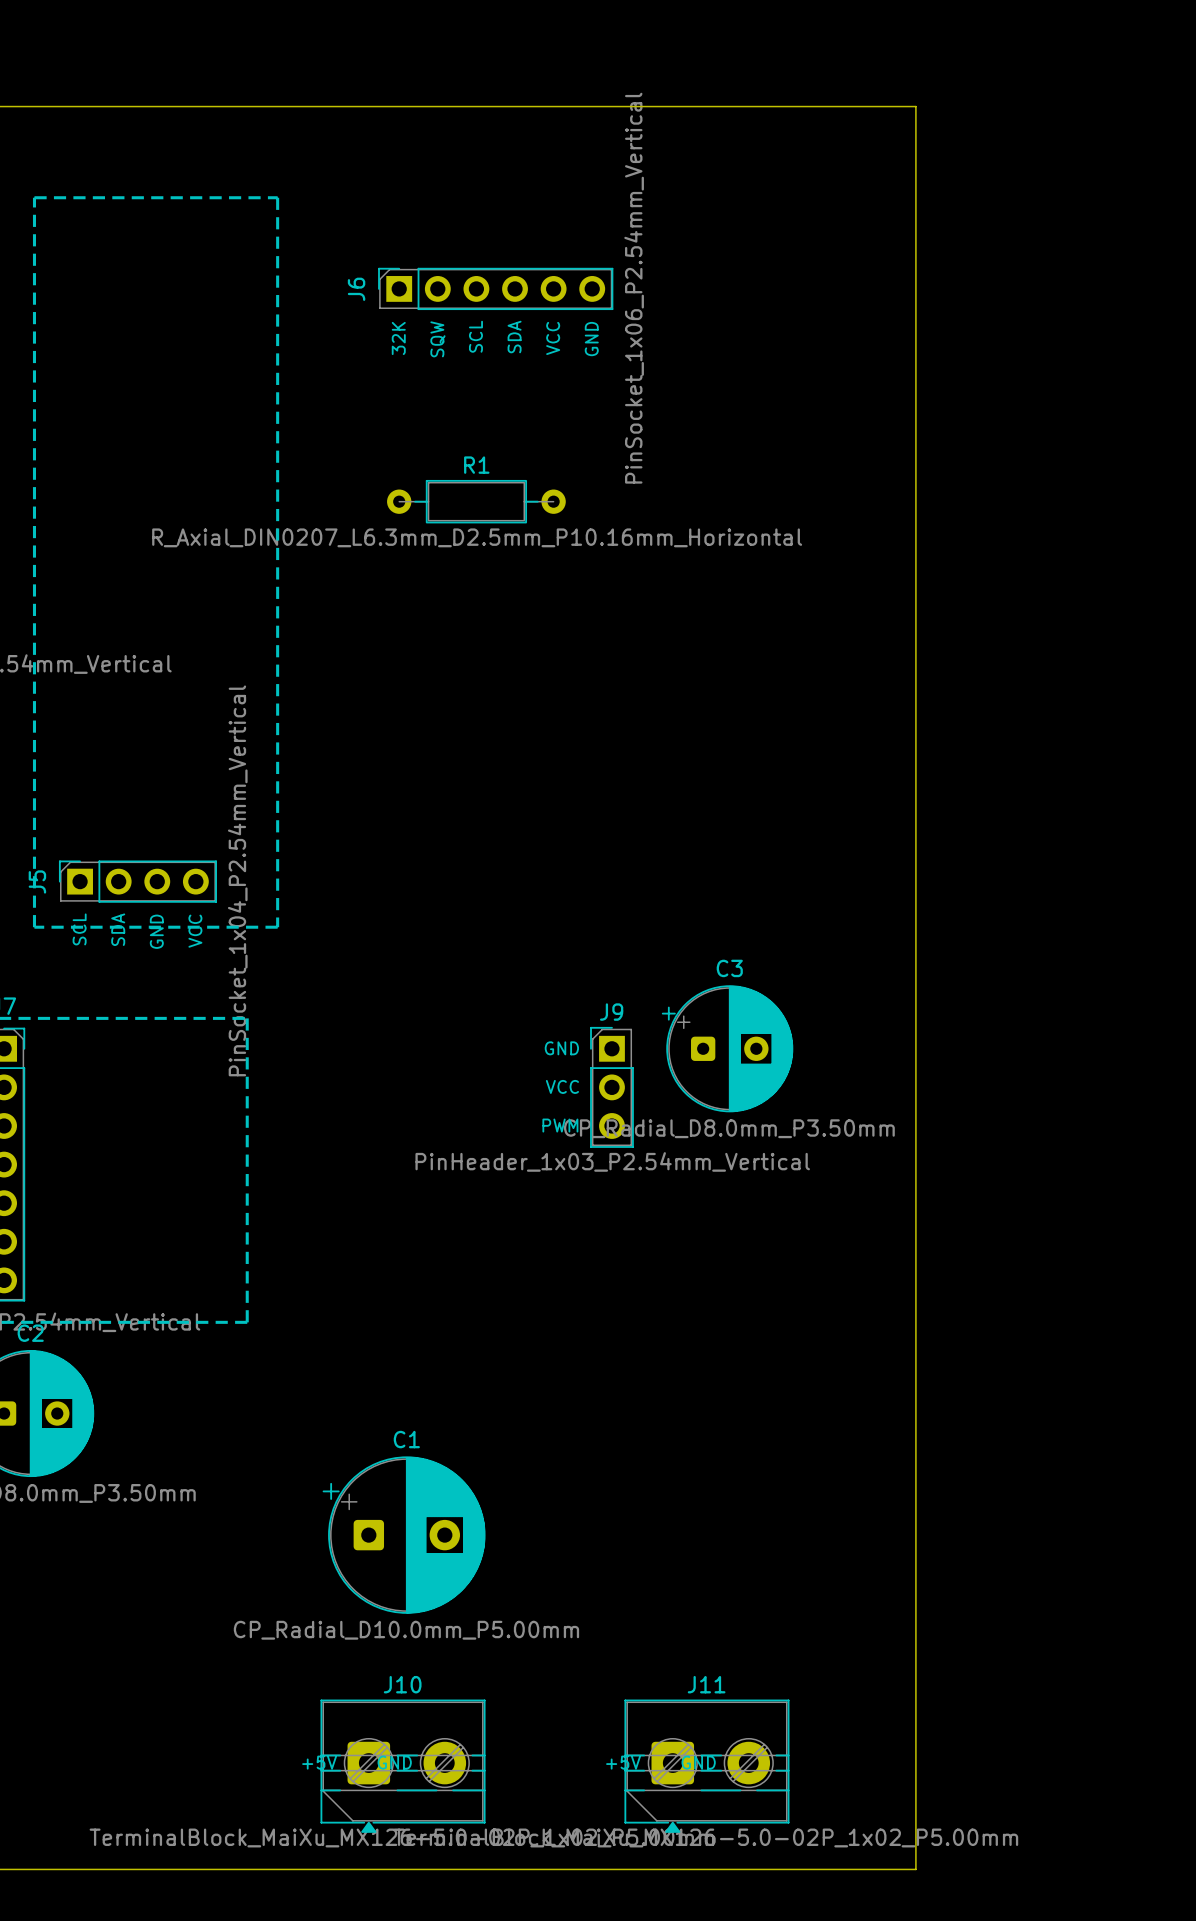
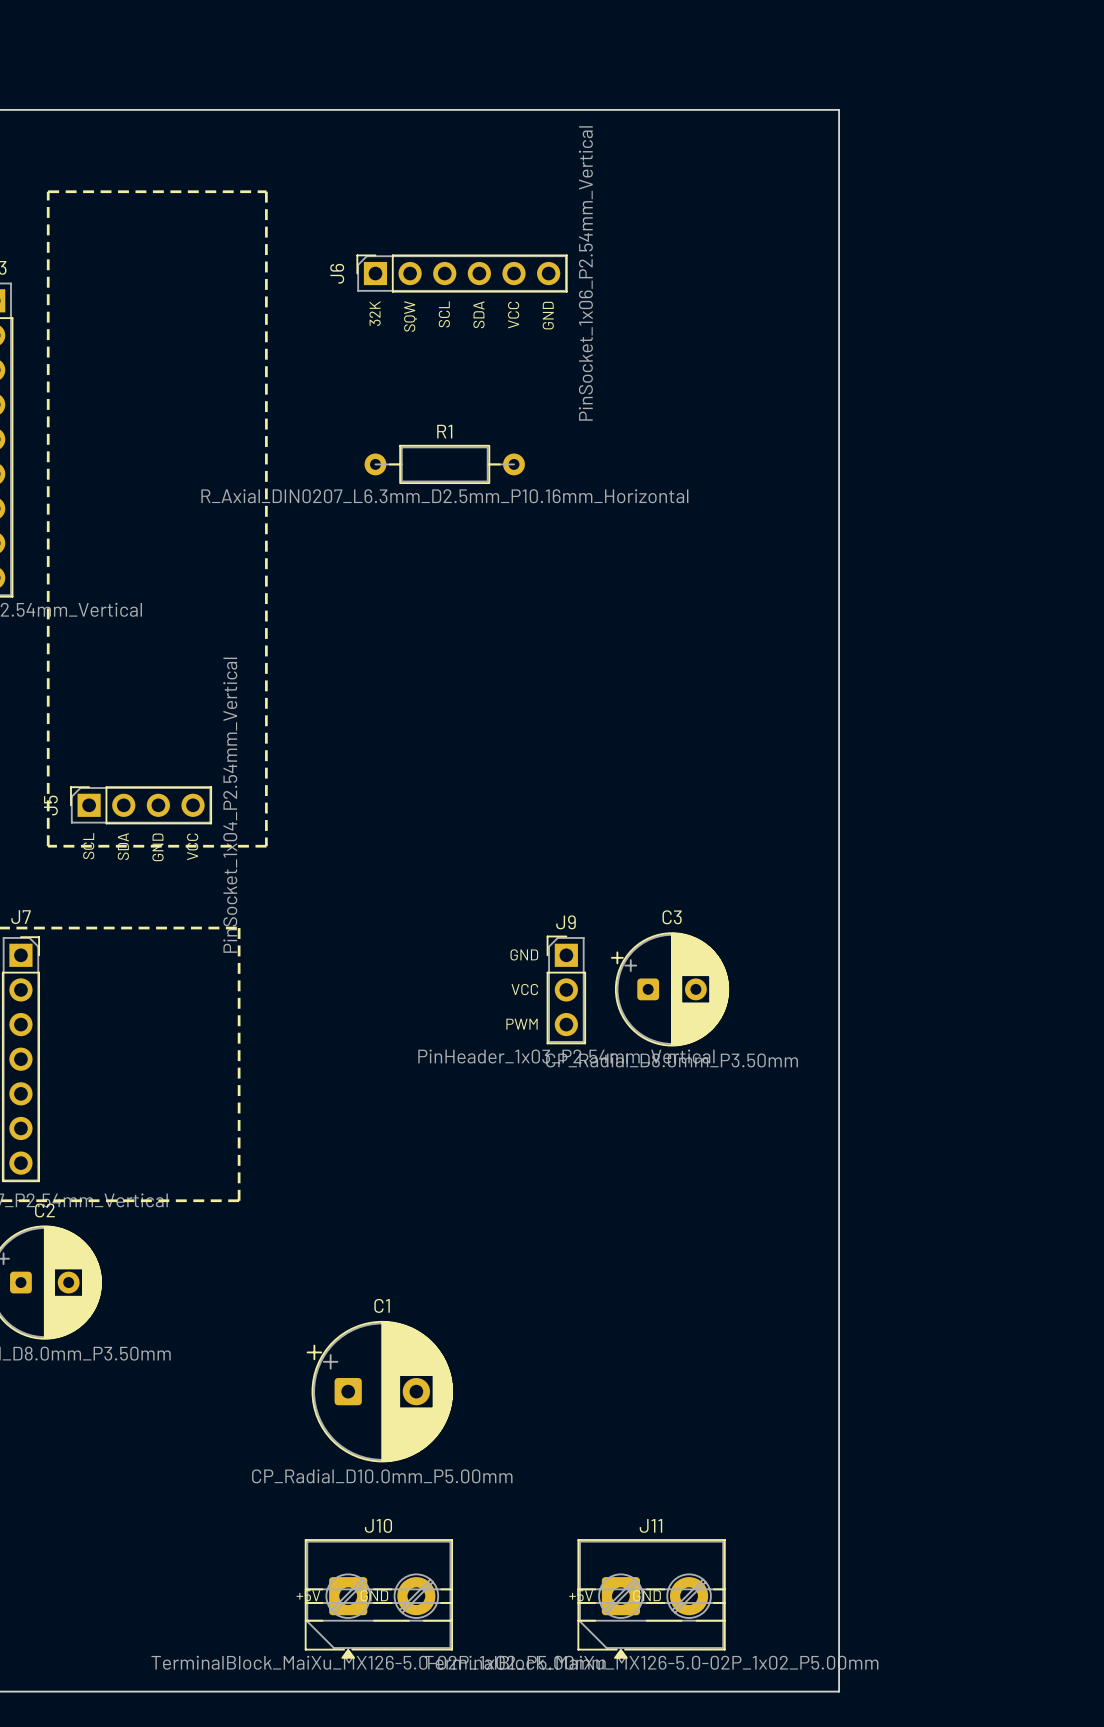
C3 position: (727, 1048) -> (670, 989)

